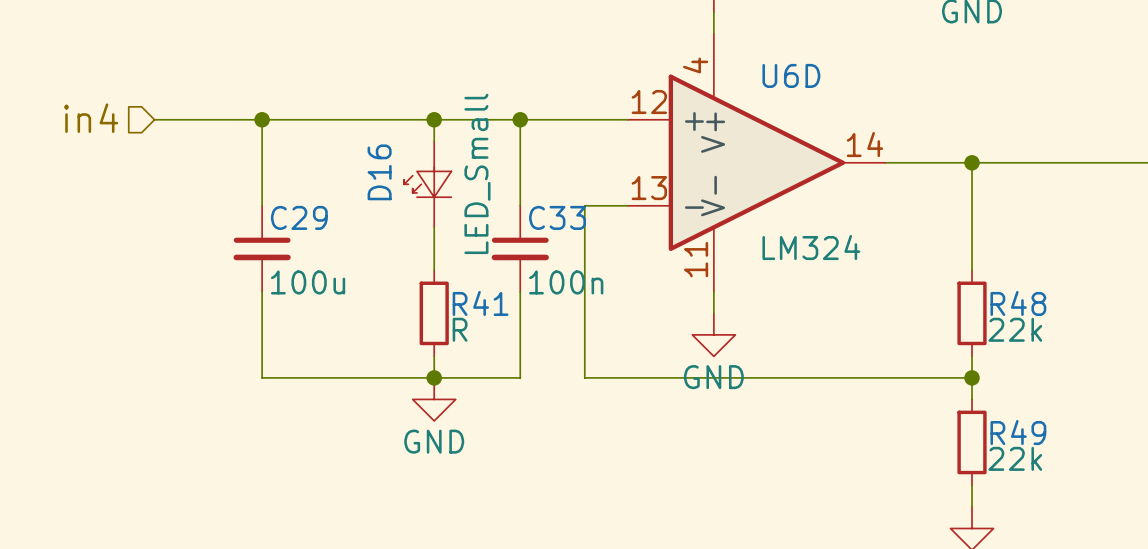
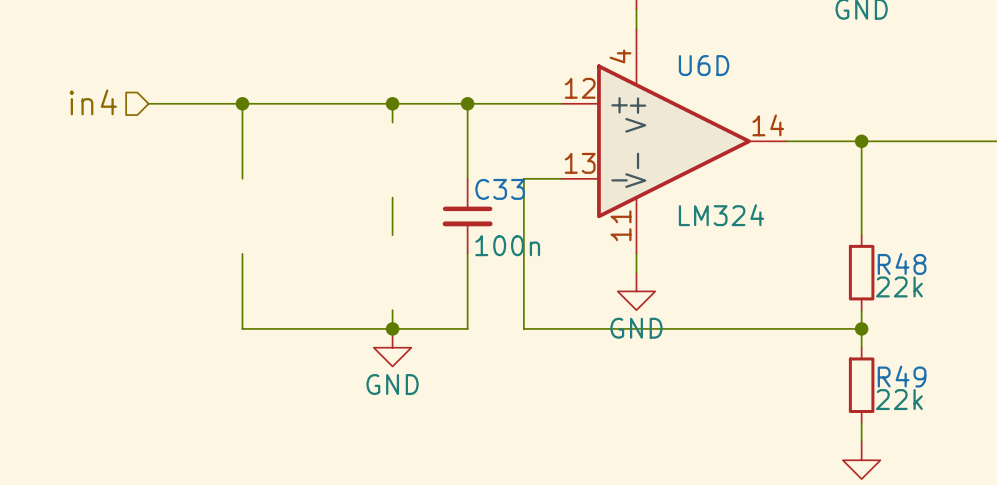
D16: LED_Small (427, 184) -> none
C29: 100u (262, 248) -> none
R41: R (434, 313) -> none

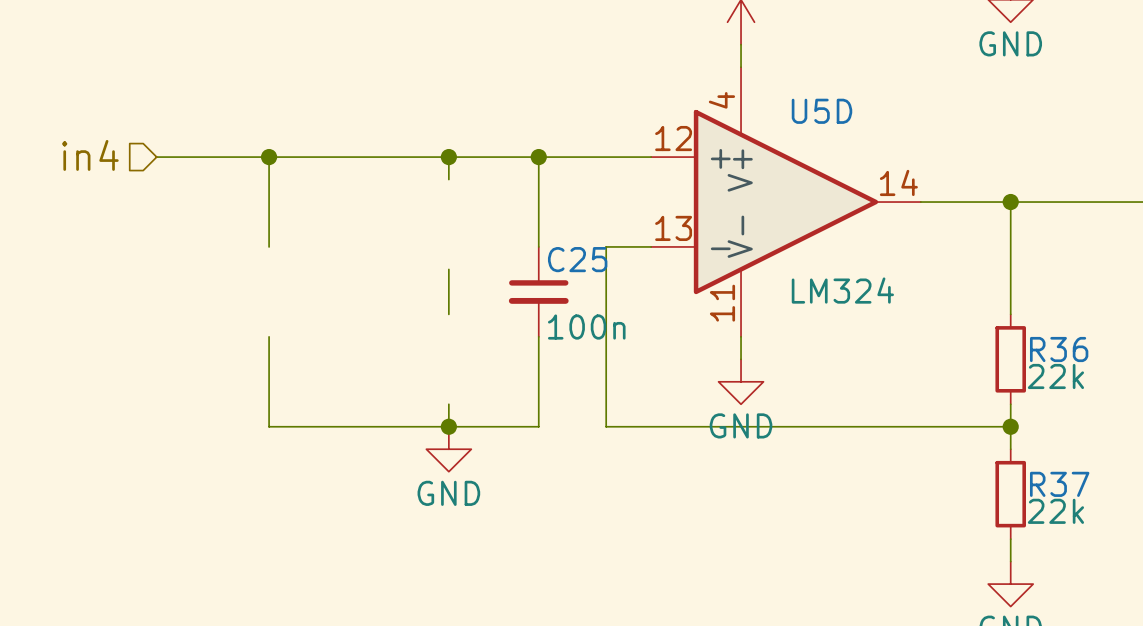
U6D name: U6D (704, 65) -> U5D (821, 111)
C33 name: C33 (500, 189) -> C25 (577, 259)
R48 name: R48 (902, 264) -> R36 (1059, 349)
R49 name: R49 (902, 376) -> R37 (1059, 484)

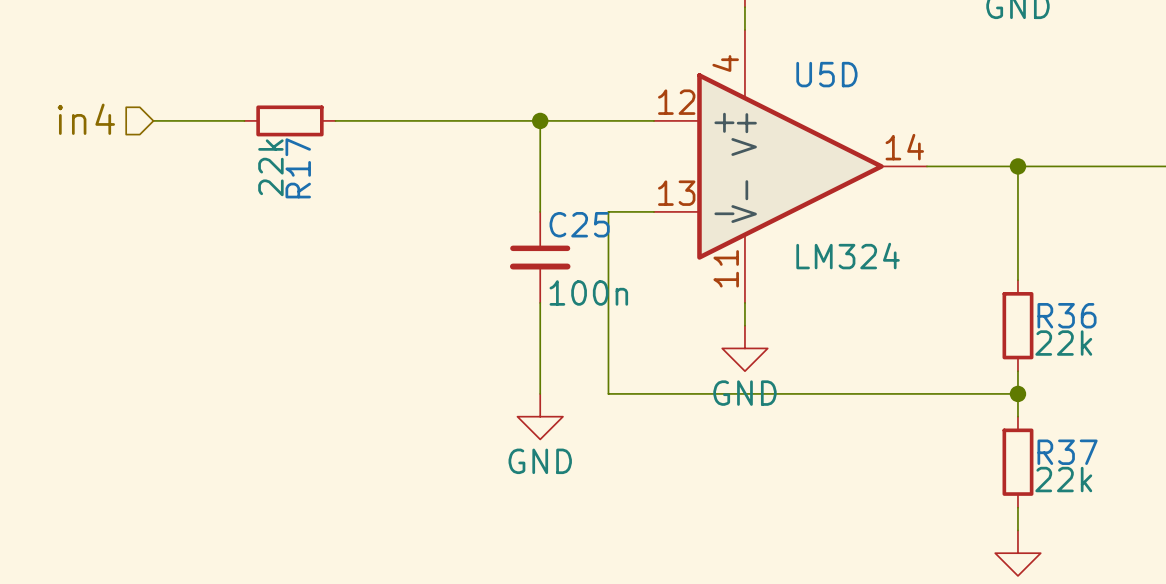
wire: (246, 157) (336, 157) -> none
wire: (269, 157) (269, 246) -> none
junction: (269, 157) -> none
R17: none -> 22k (289, 120)
wire: (448, 157) (448, 179) -> none
junction: (448, 157) -> none
wire: (448, 269) (448, 314) -> none
wire: (269, 336) (269, 426) (538, 426) -> none
wire: (448, 404) (448, 426) -> none
junction: (448, 426) -> none
power symbol position: GND (448, 449) -> GND (540, 416)

